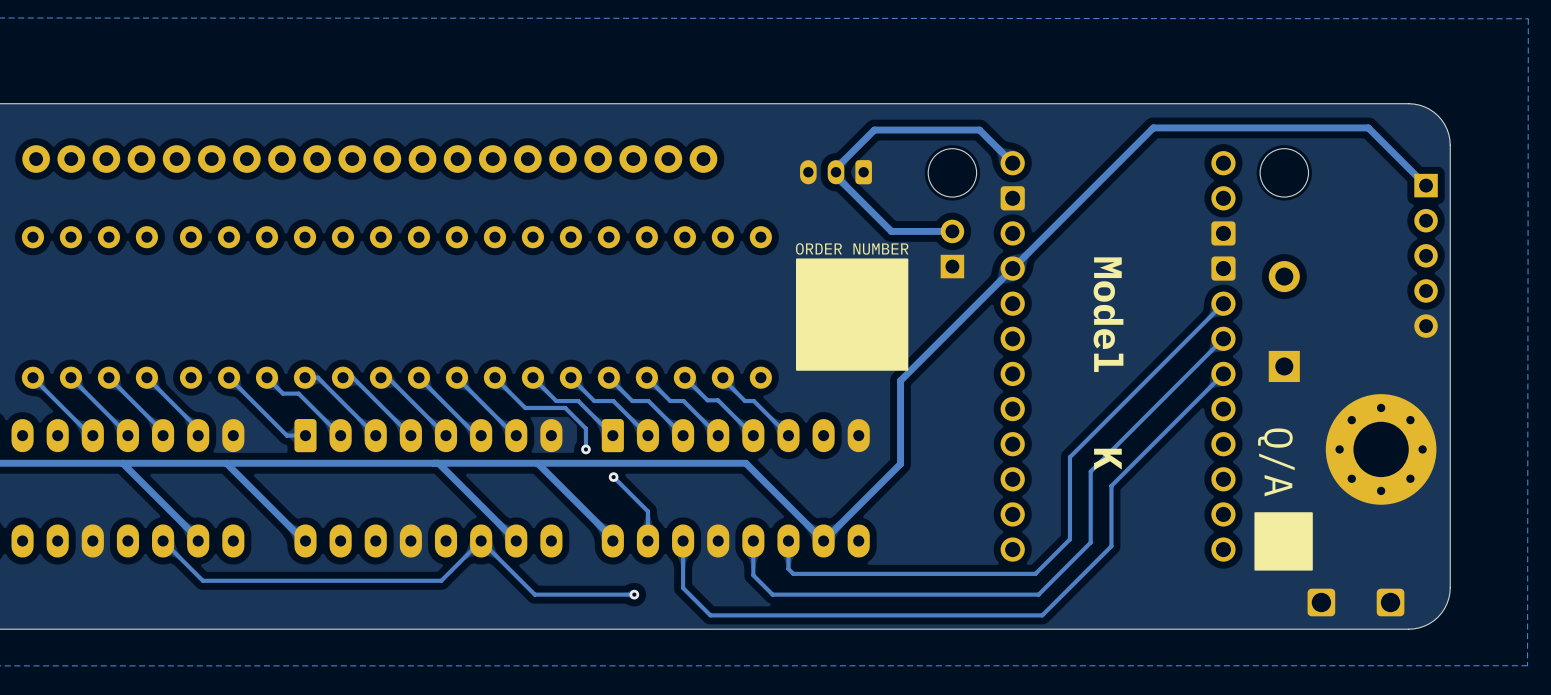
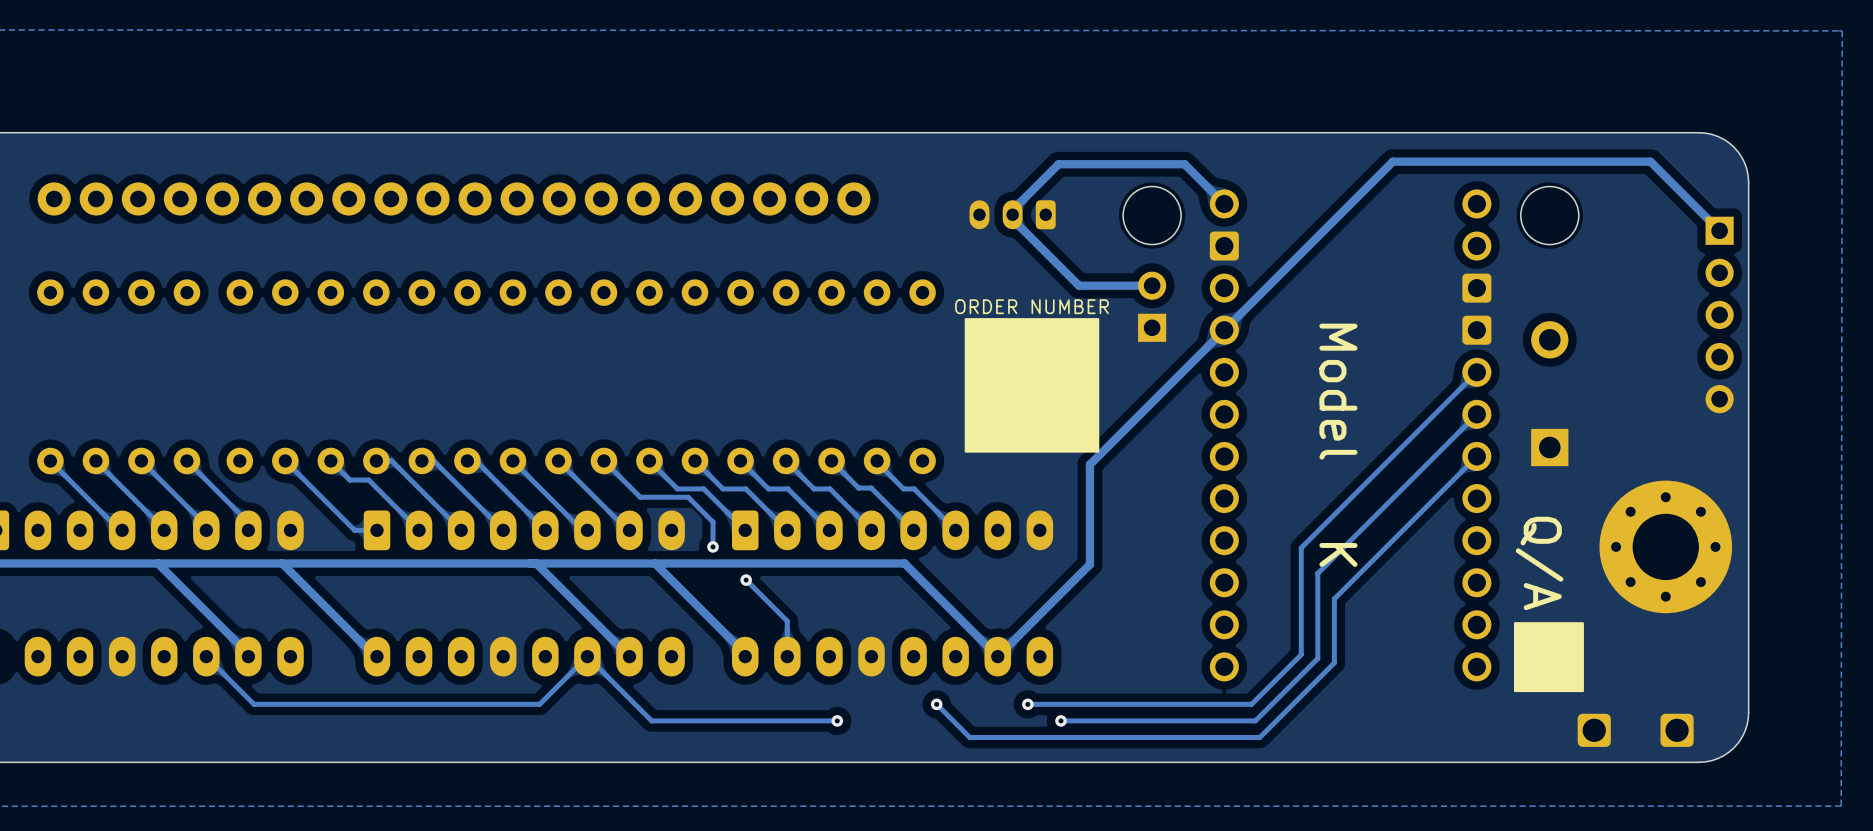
track: (1076, 450) (1069, 457) (1069, 539) (1035, 573) (793, 573) (788, 568) (788, 540) -> (1301, 547) (1301, 654) (1251, 704) (1027, 704)
track: (1111, 485) (1111, 546) (1042, 615) (710, 615) (683, 588) (683, 540) -> (1342, 590) (1334, 598) (1334, 662) (1259, 737) (969, 737) (936, 704)
track: (753, 540) (753, 575) (772, 594) (876, 594) -> none
via: none -> (936, 704)
via: none -> (1027, 704)
via position: (634, 594) -> (837, 720)
track: none -> (837, 720) (771, 720)
via: none -> (1060, 720)

